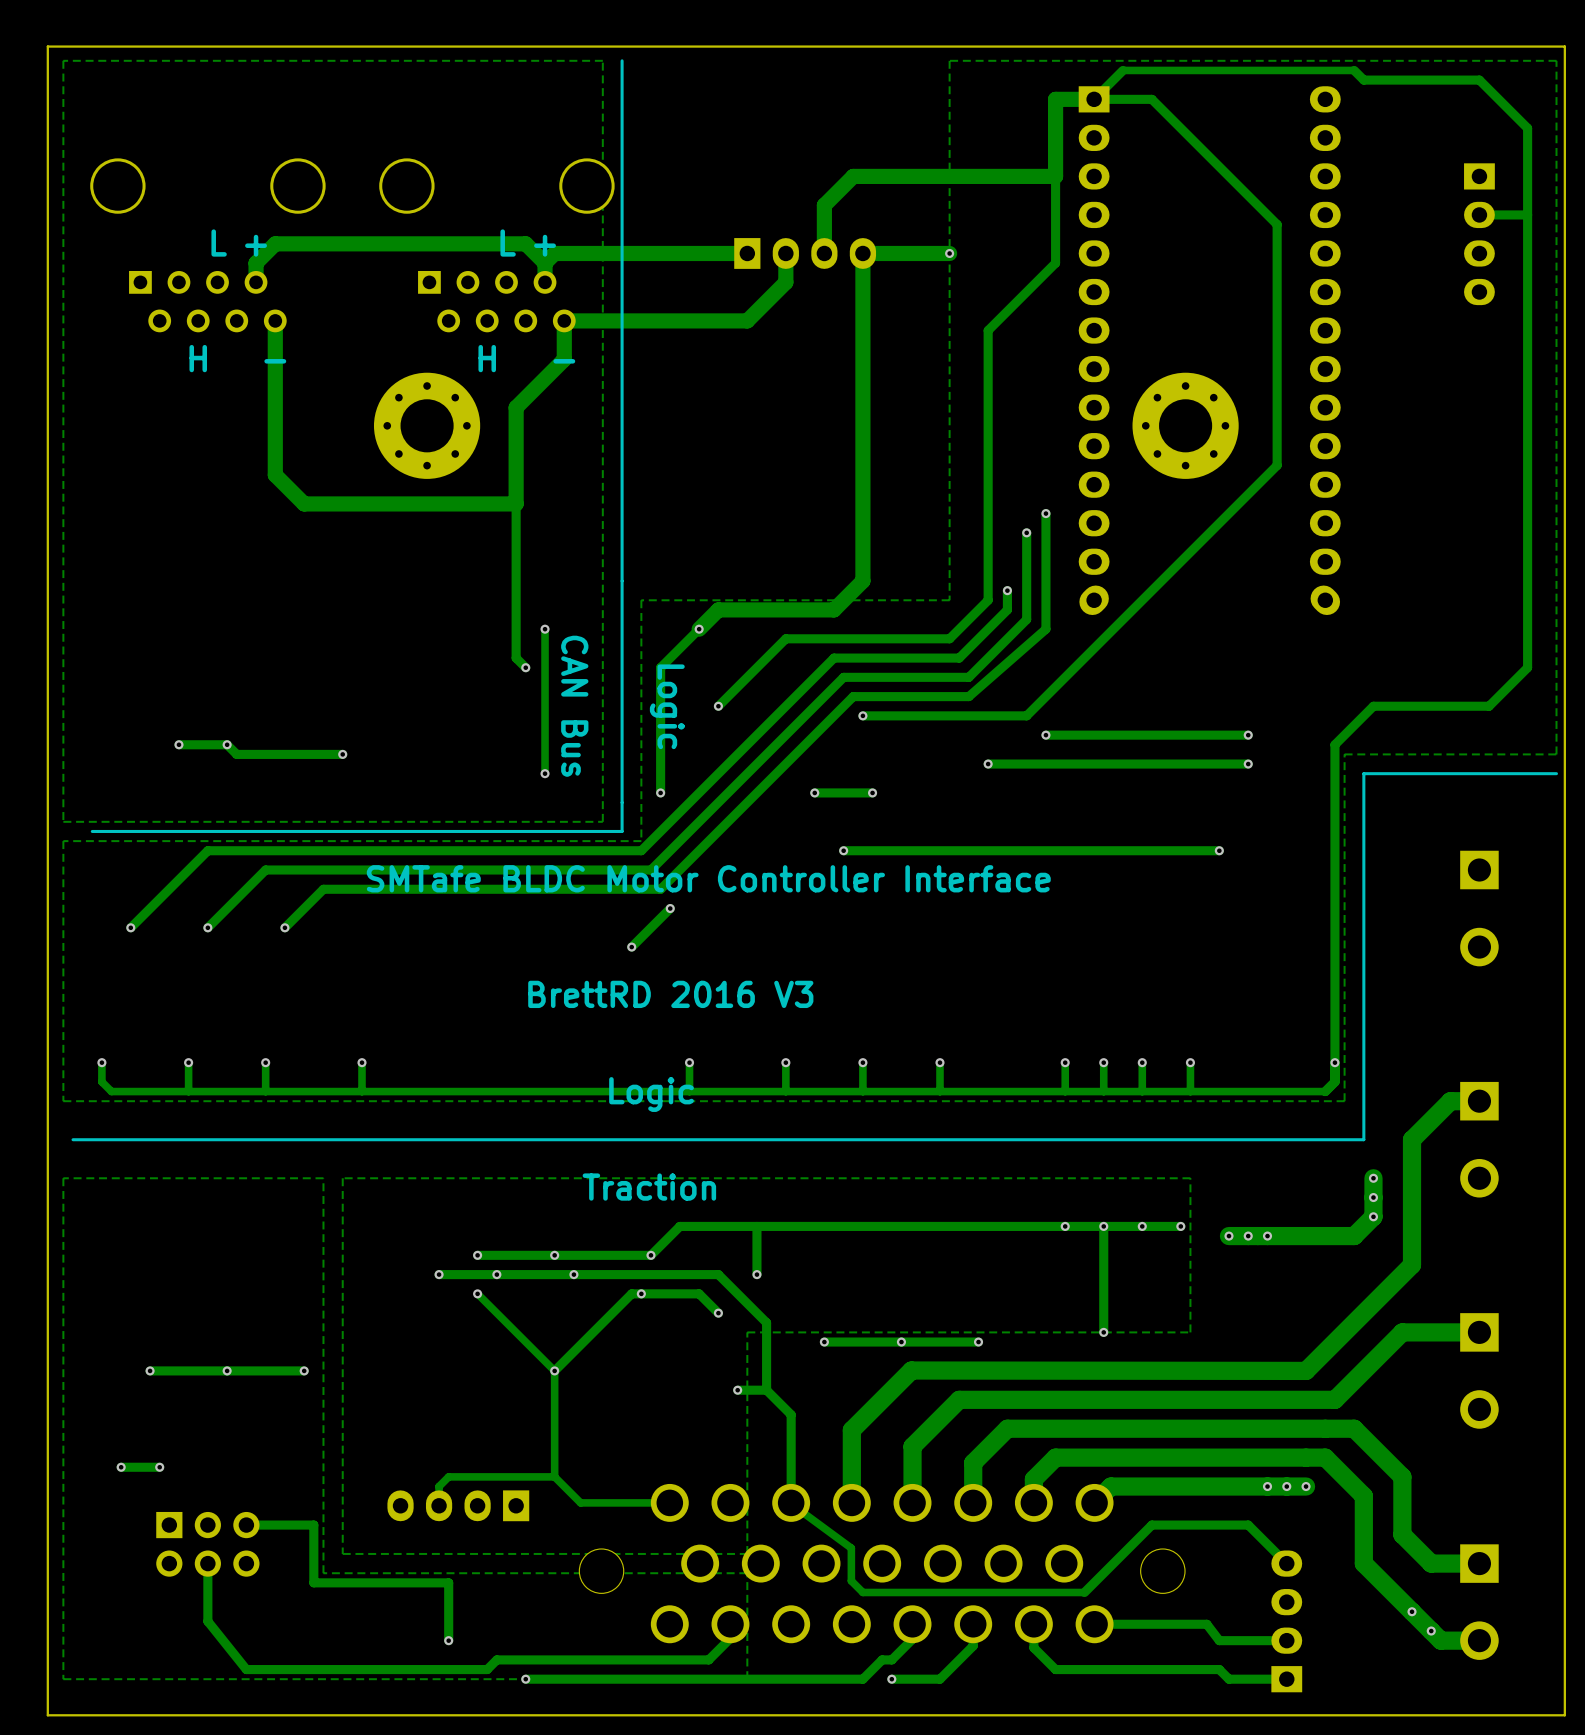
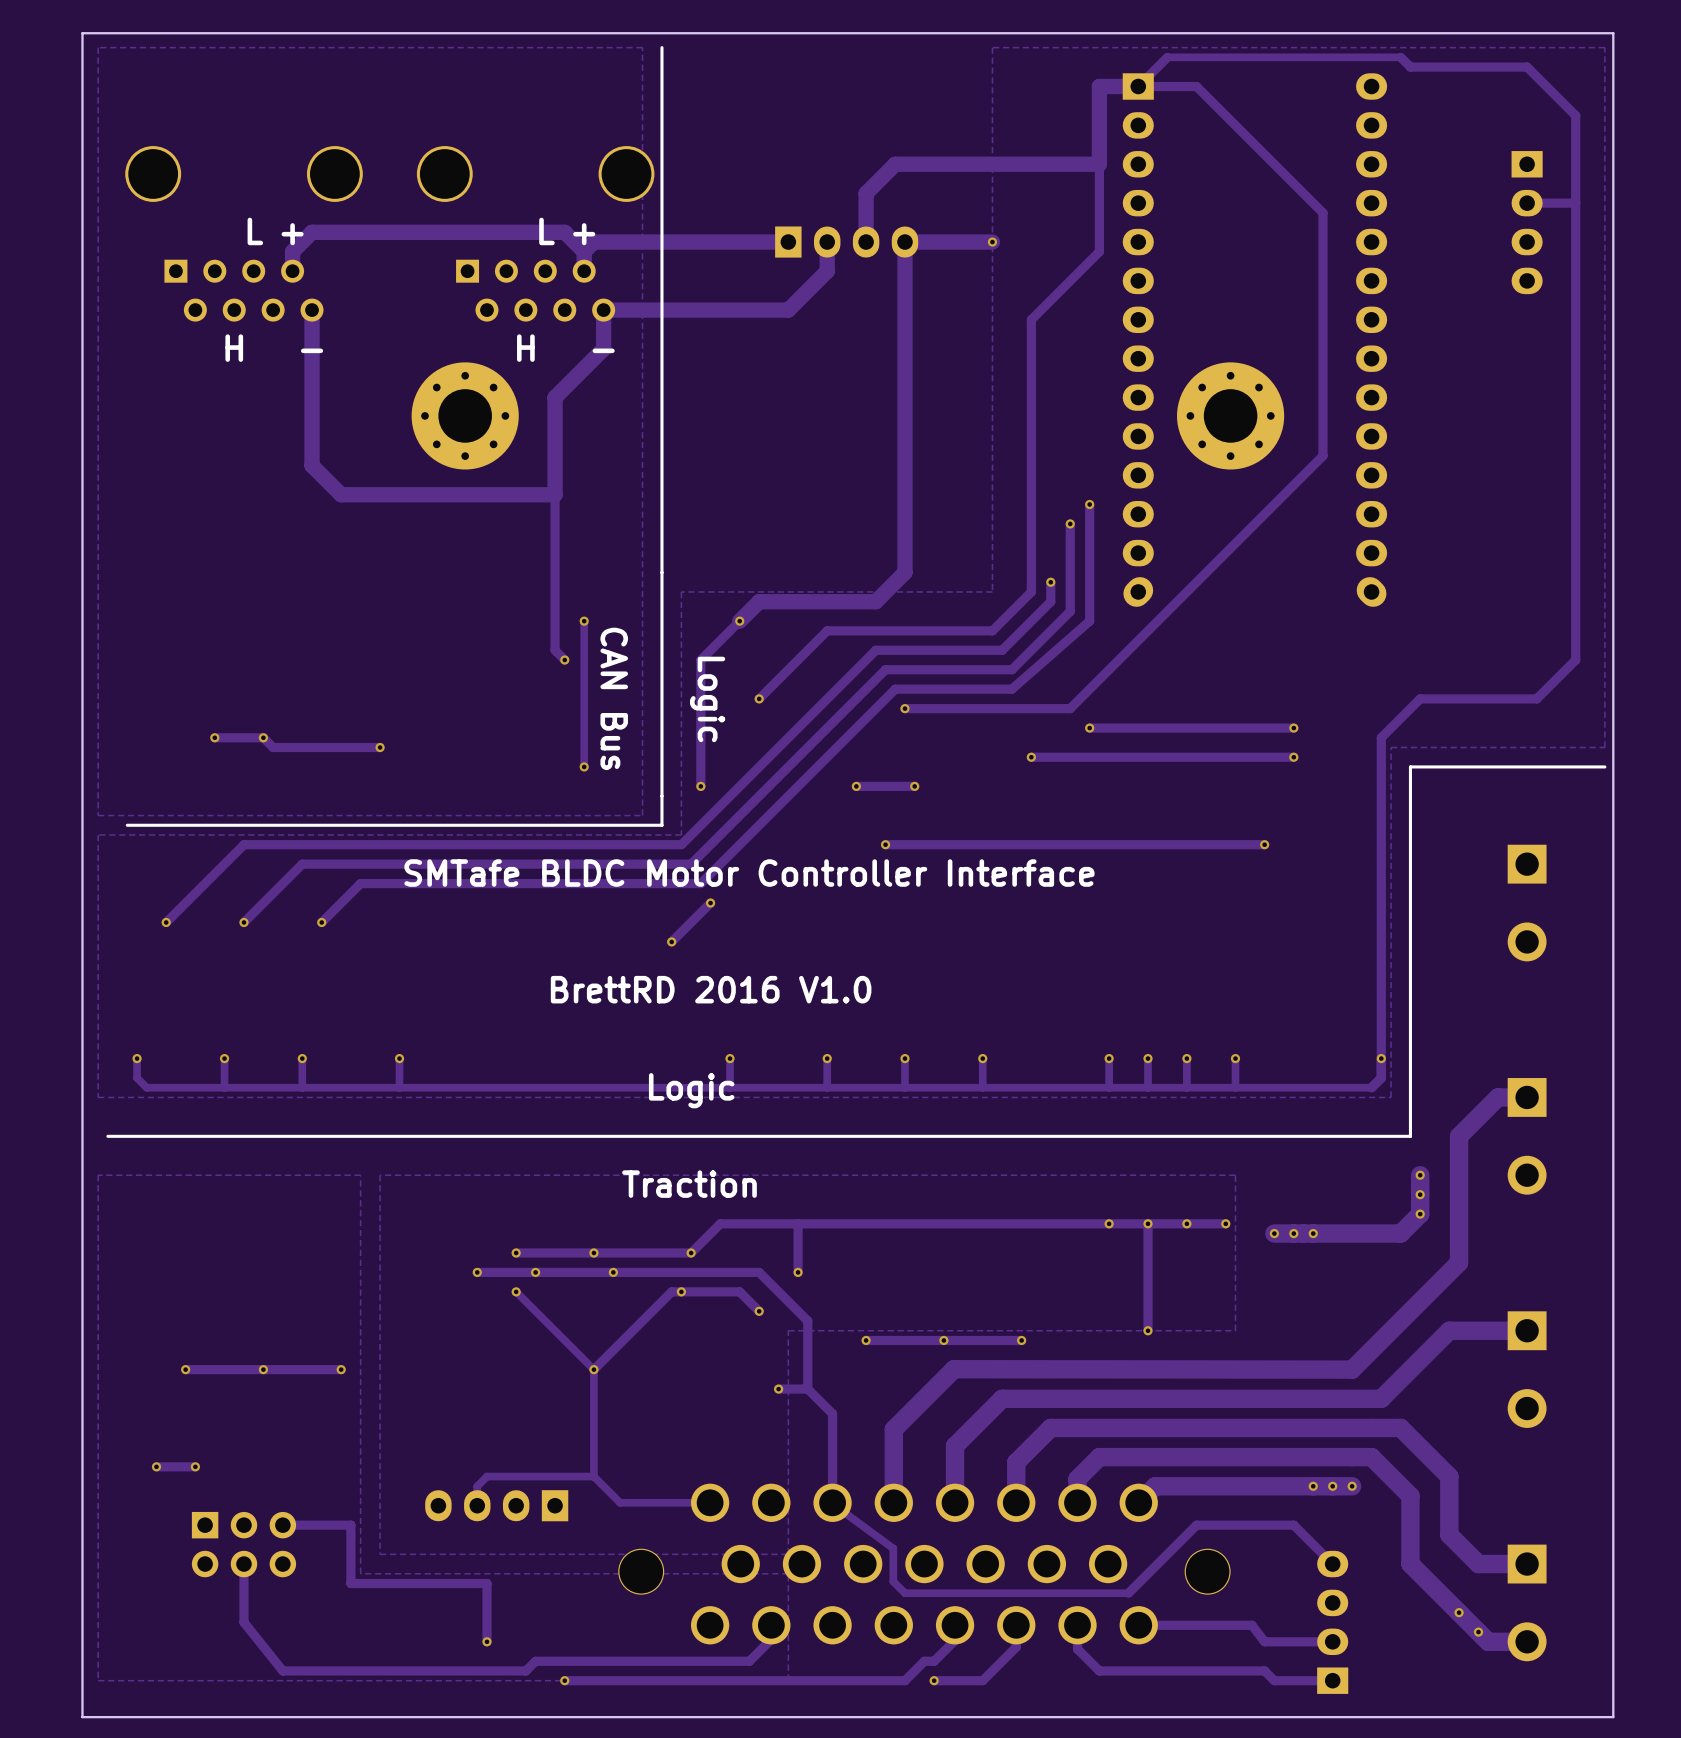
text: BrettRD 2016 V3 (670, 994) -> BrettRD 2016 V1.0 (711, 989)

